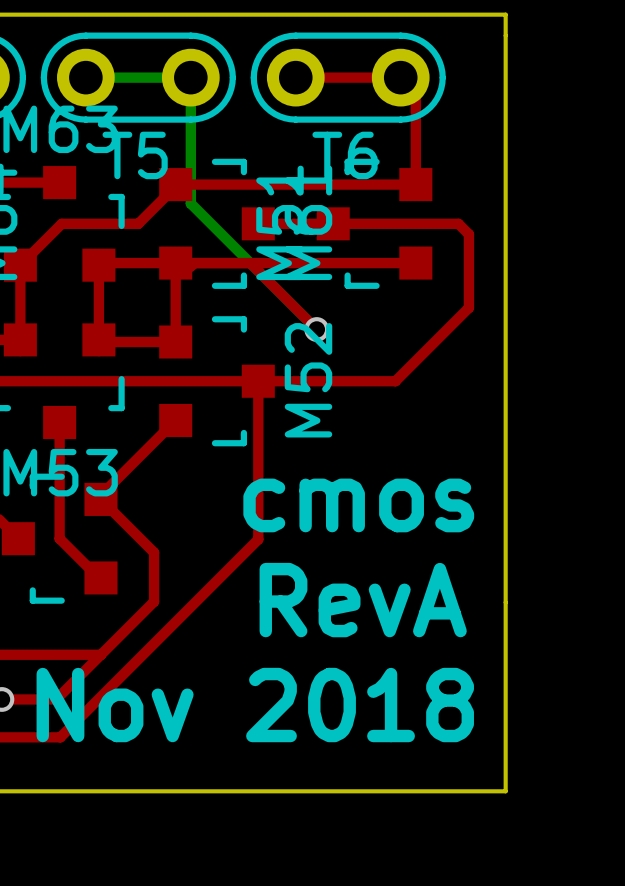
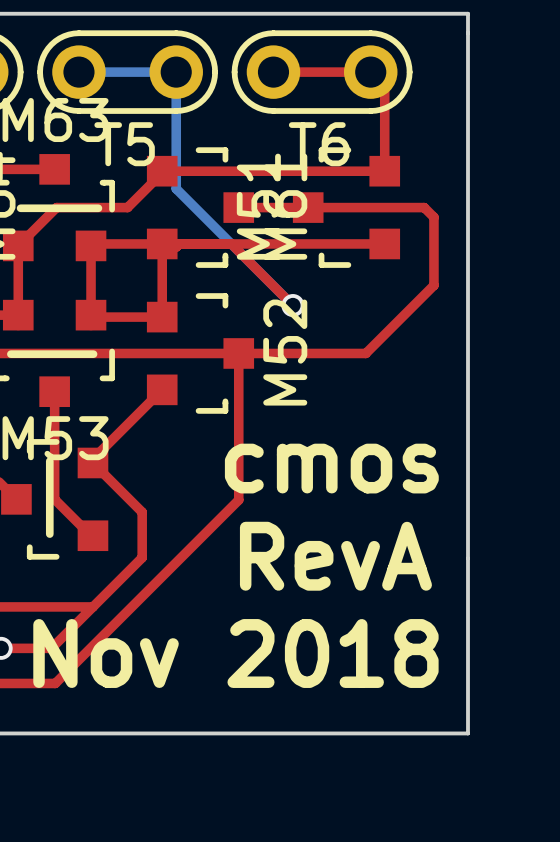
line: none -> (20, 208) (98, 208)
line: none -> (10, 354) (93, 354)
line: none -> (49, 461) (49, 534)

